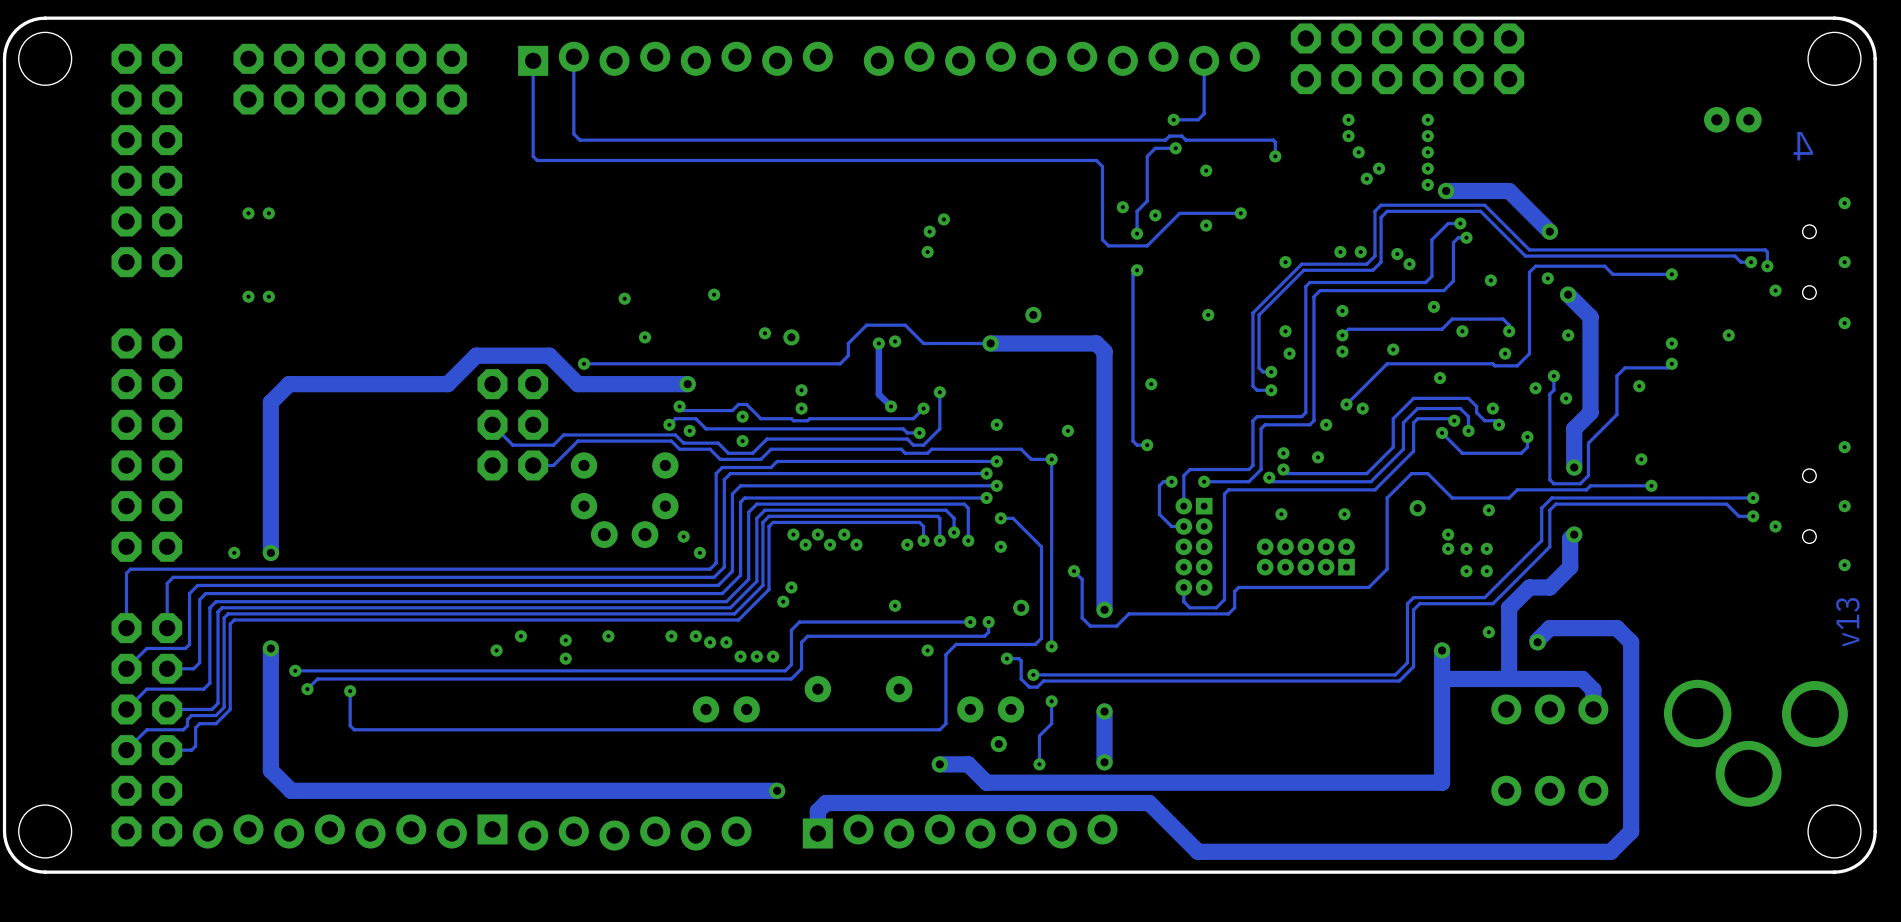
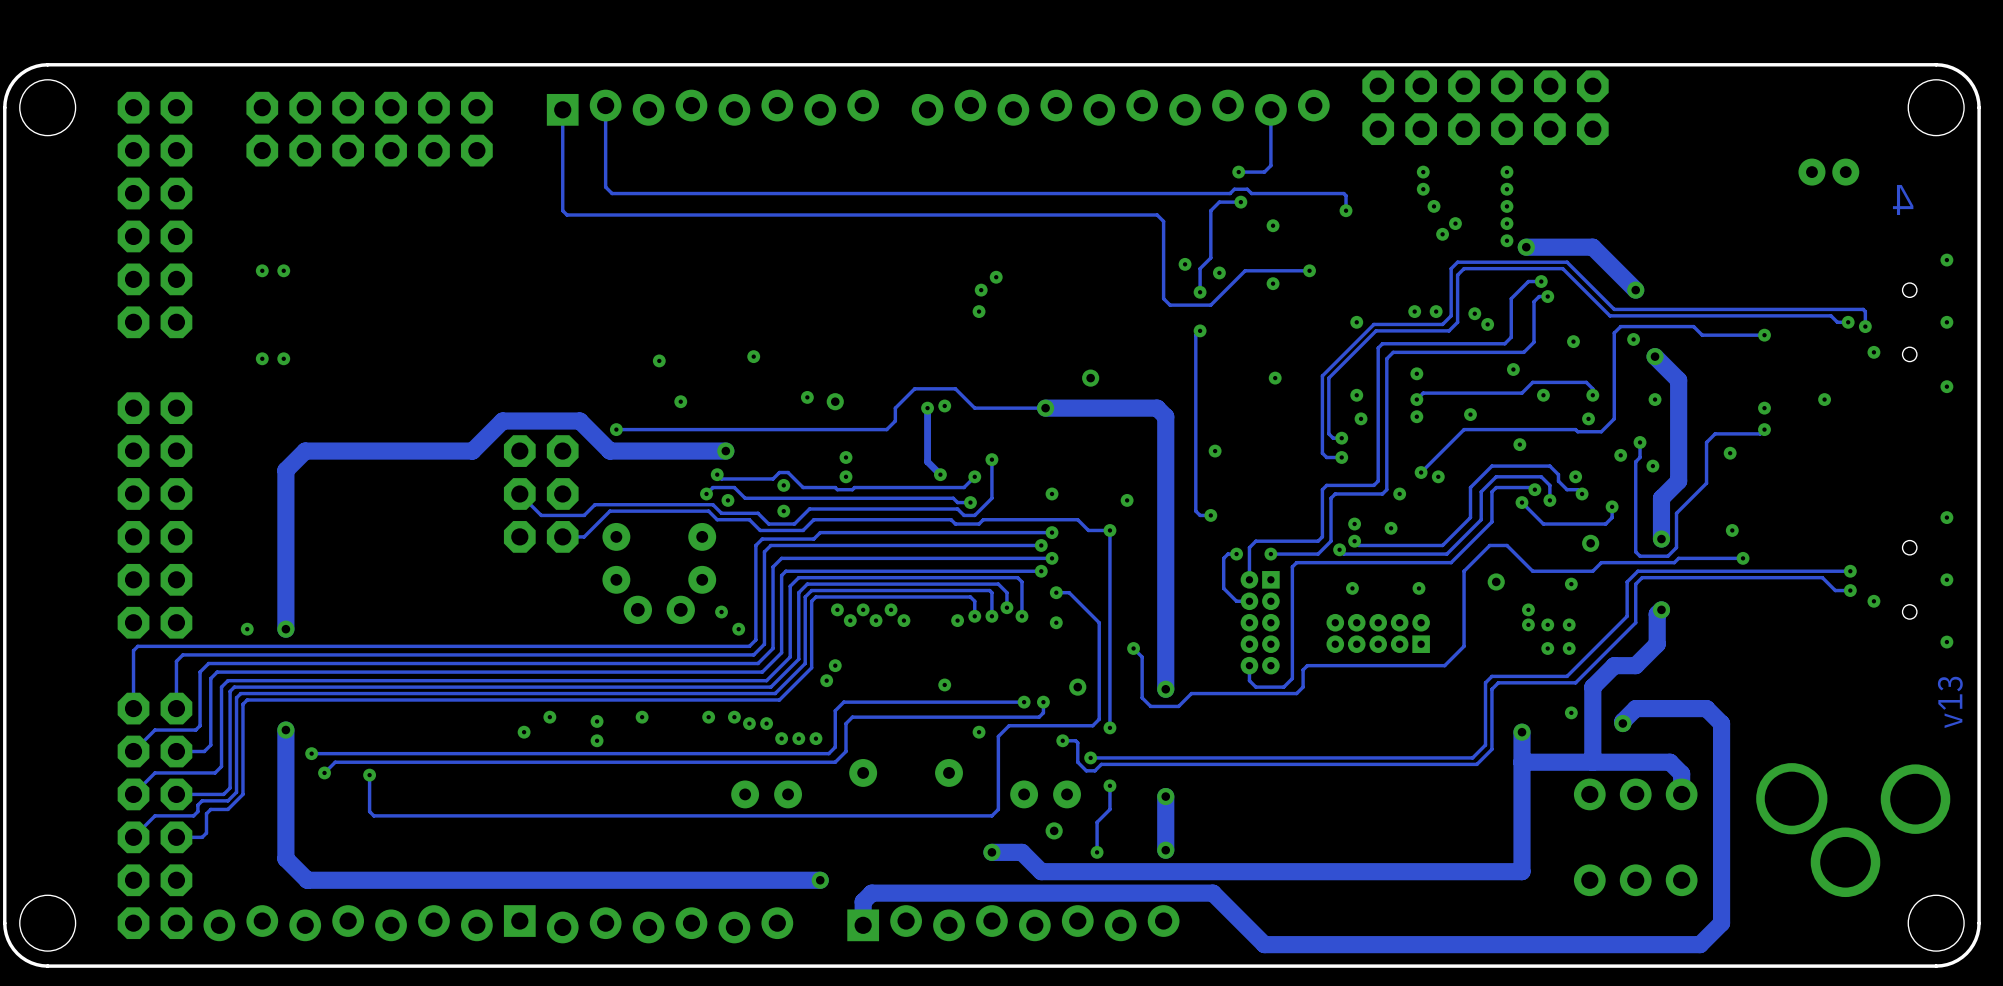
via: none -> (1590, 543)

